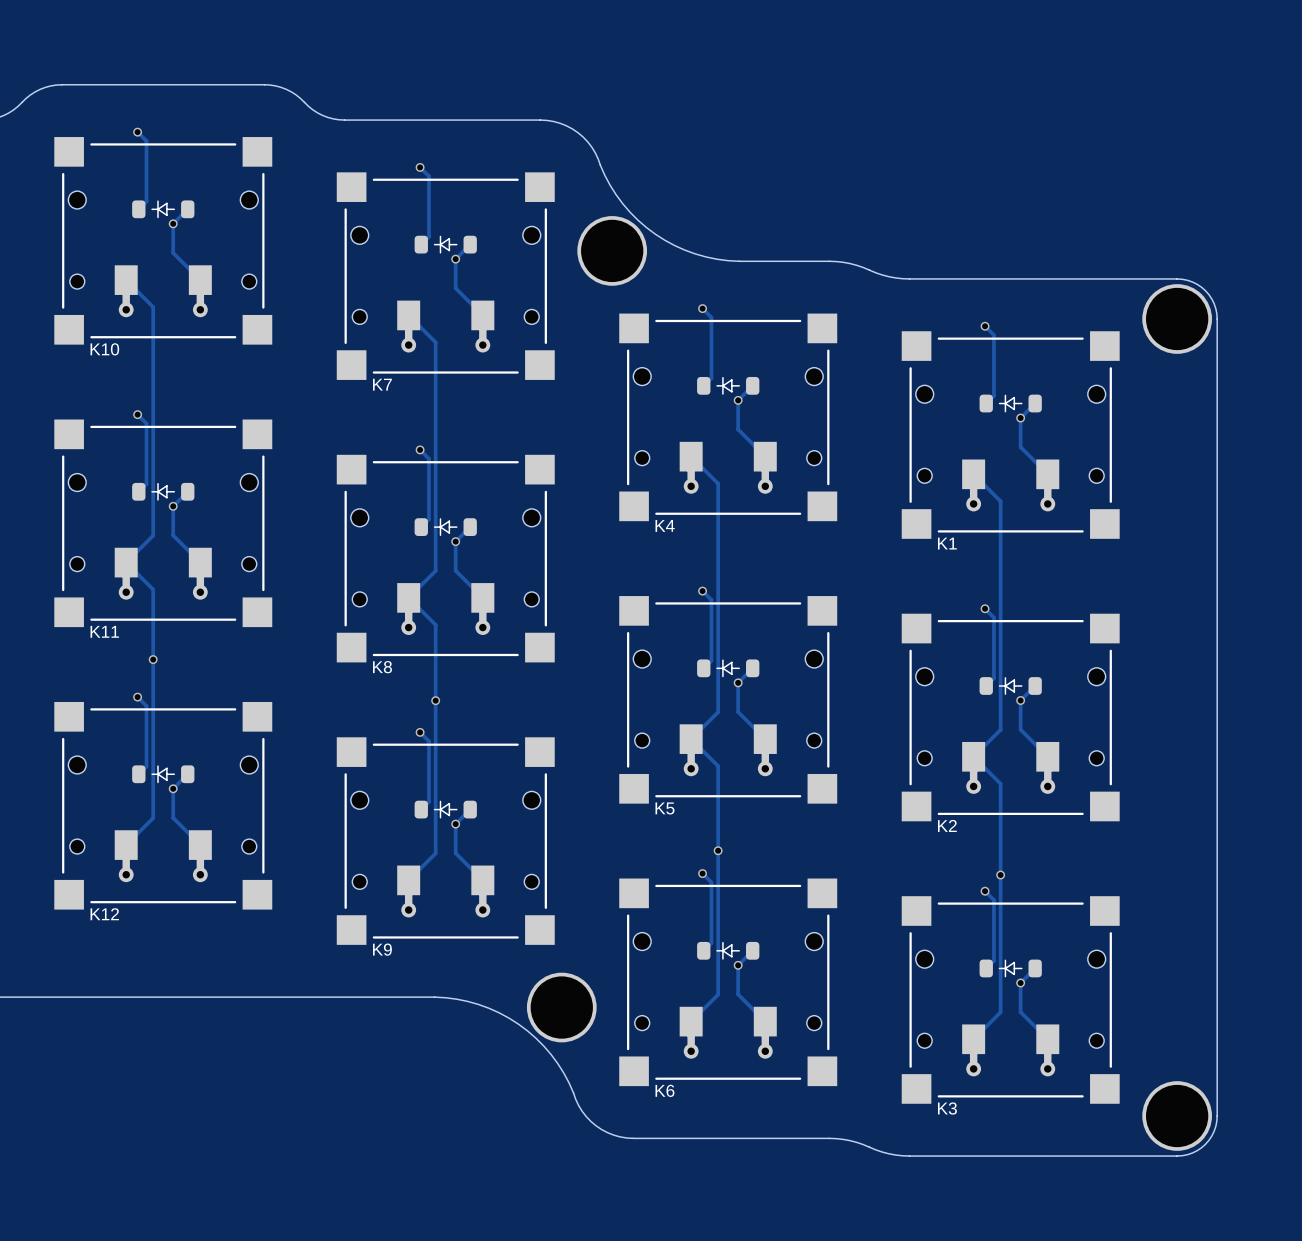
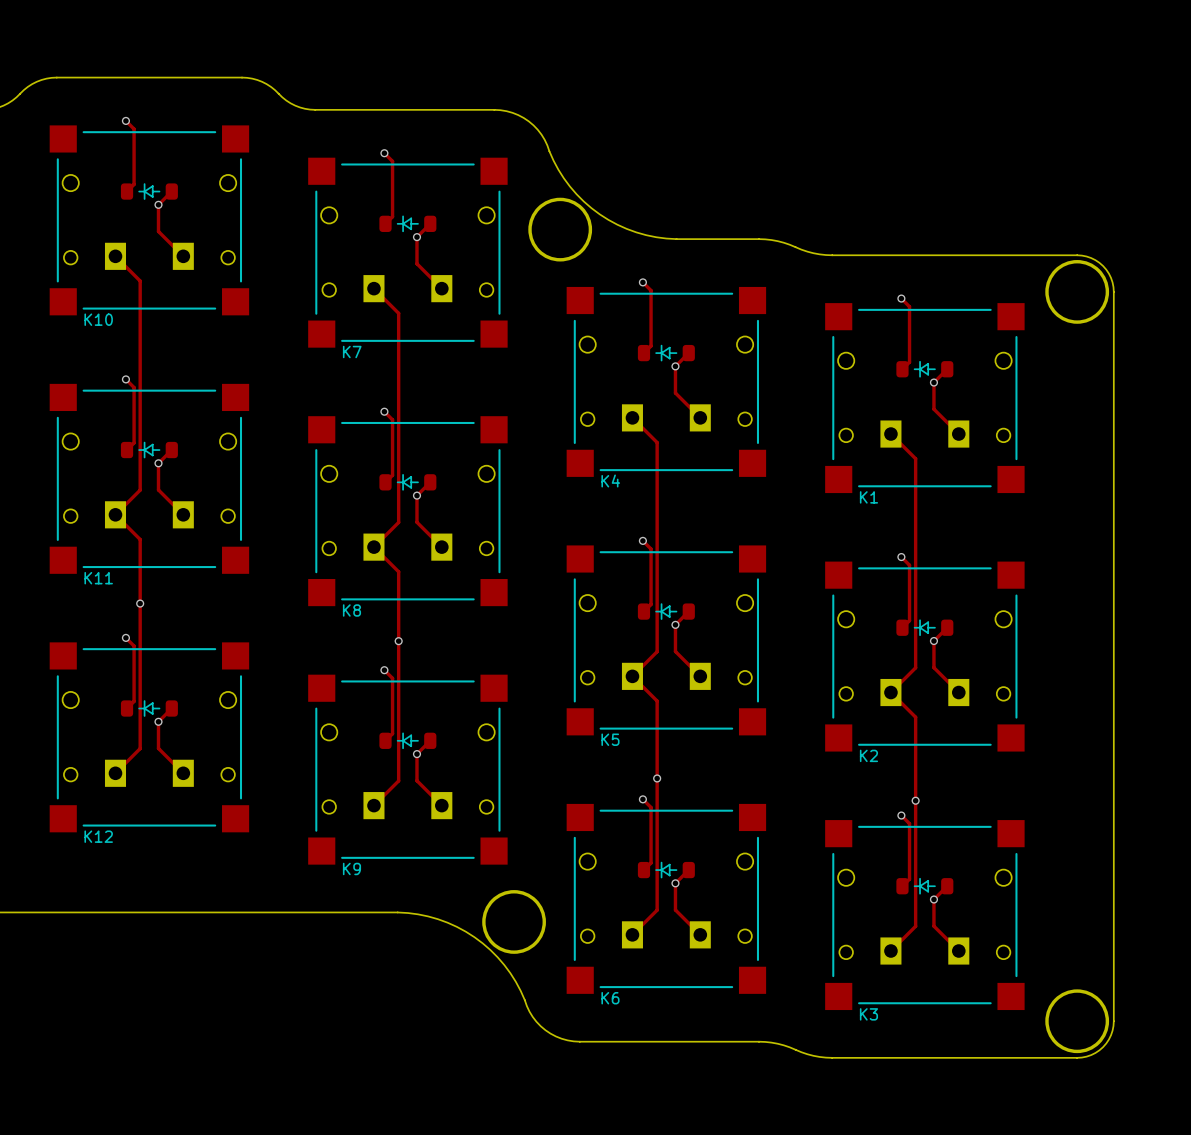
K10 footprint: [54, 137, 273, 345] -> [49, 125, 250, 316]
K7 footprint: [336, 172, 555, 380] -> [308, 157, 508, 348]
K4 footprint: [619, 313, 838, 522] -> [566, 286, 767, 477]
K1 footprint: [901, 331, 1120, 539] -> [825, 303, 1025, 494]
K11 footprint: [54, 419, 273, 628] -> [49, 383, 250, 574]
K8 footprint: [336, 454, 555, 663] -> [308, 416, 508, 607]
K5 footprint: [619, 596, 838, 804] -> [566, 545, 767, 736]
K2 footprint: [901, 613, 1120, 822] -> [825, 561, 1025, 752]
K12 footprint: [54, 701, 273, 910] -> [49, 642, 250, 833]
K9 footprint: [336, 737, 555, 945] -> [308, 674, 508, 865]
K6 footprint: [619, 878, 838, 1087] -> [566, 803, 767, 994]
K3 footprint: [901, 896, 1120, 1104] -> [825, 820, 1025, 1011]

